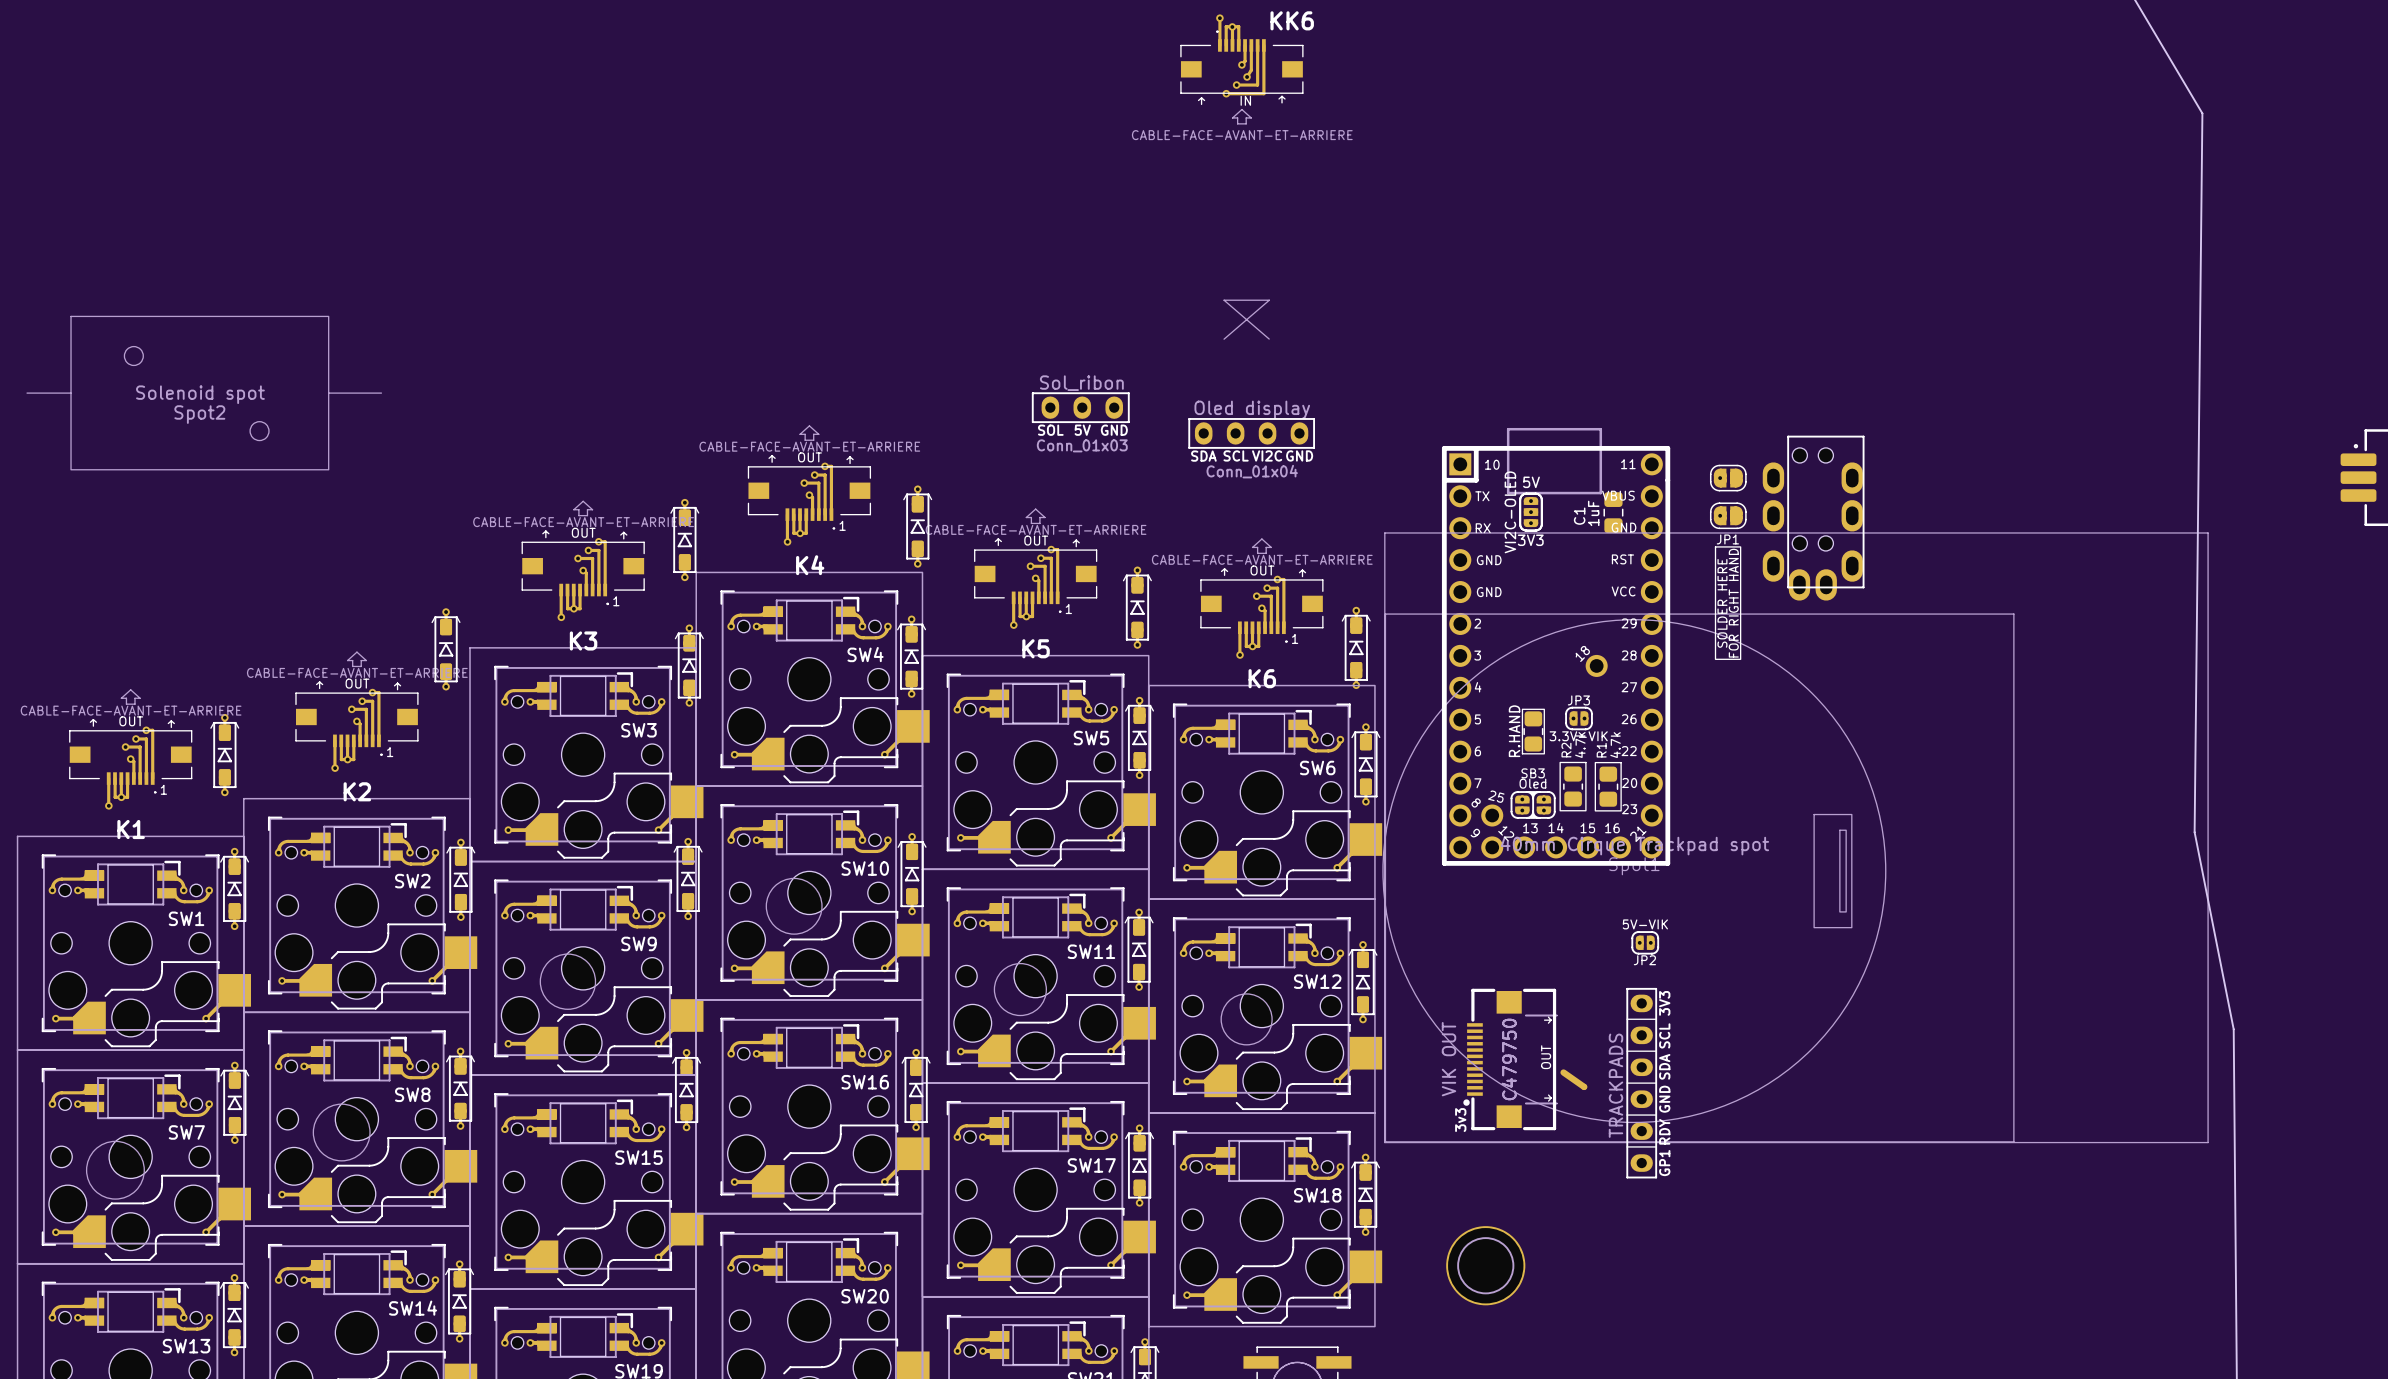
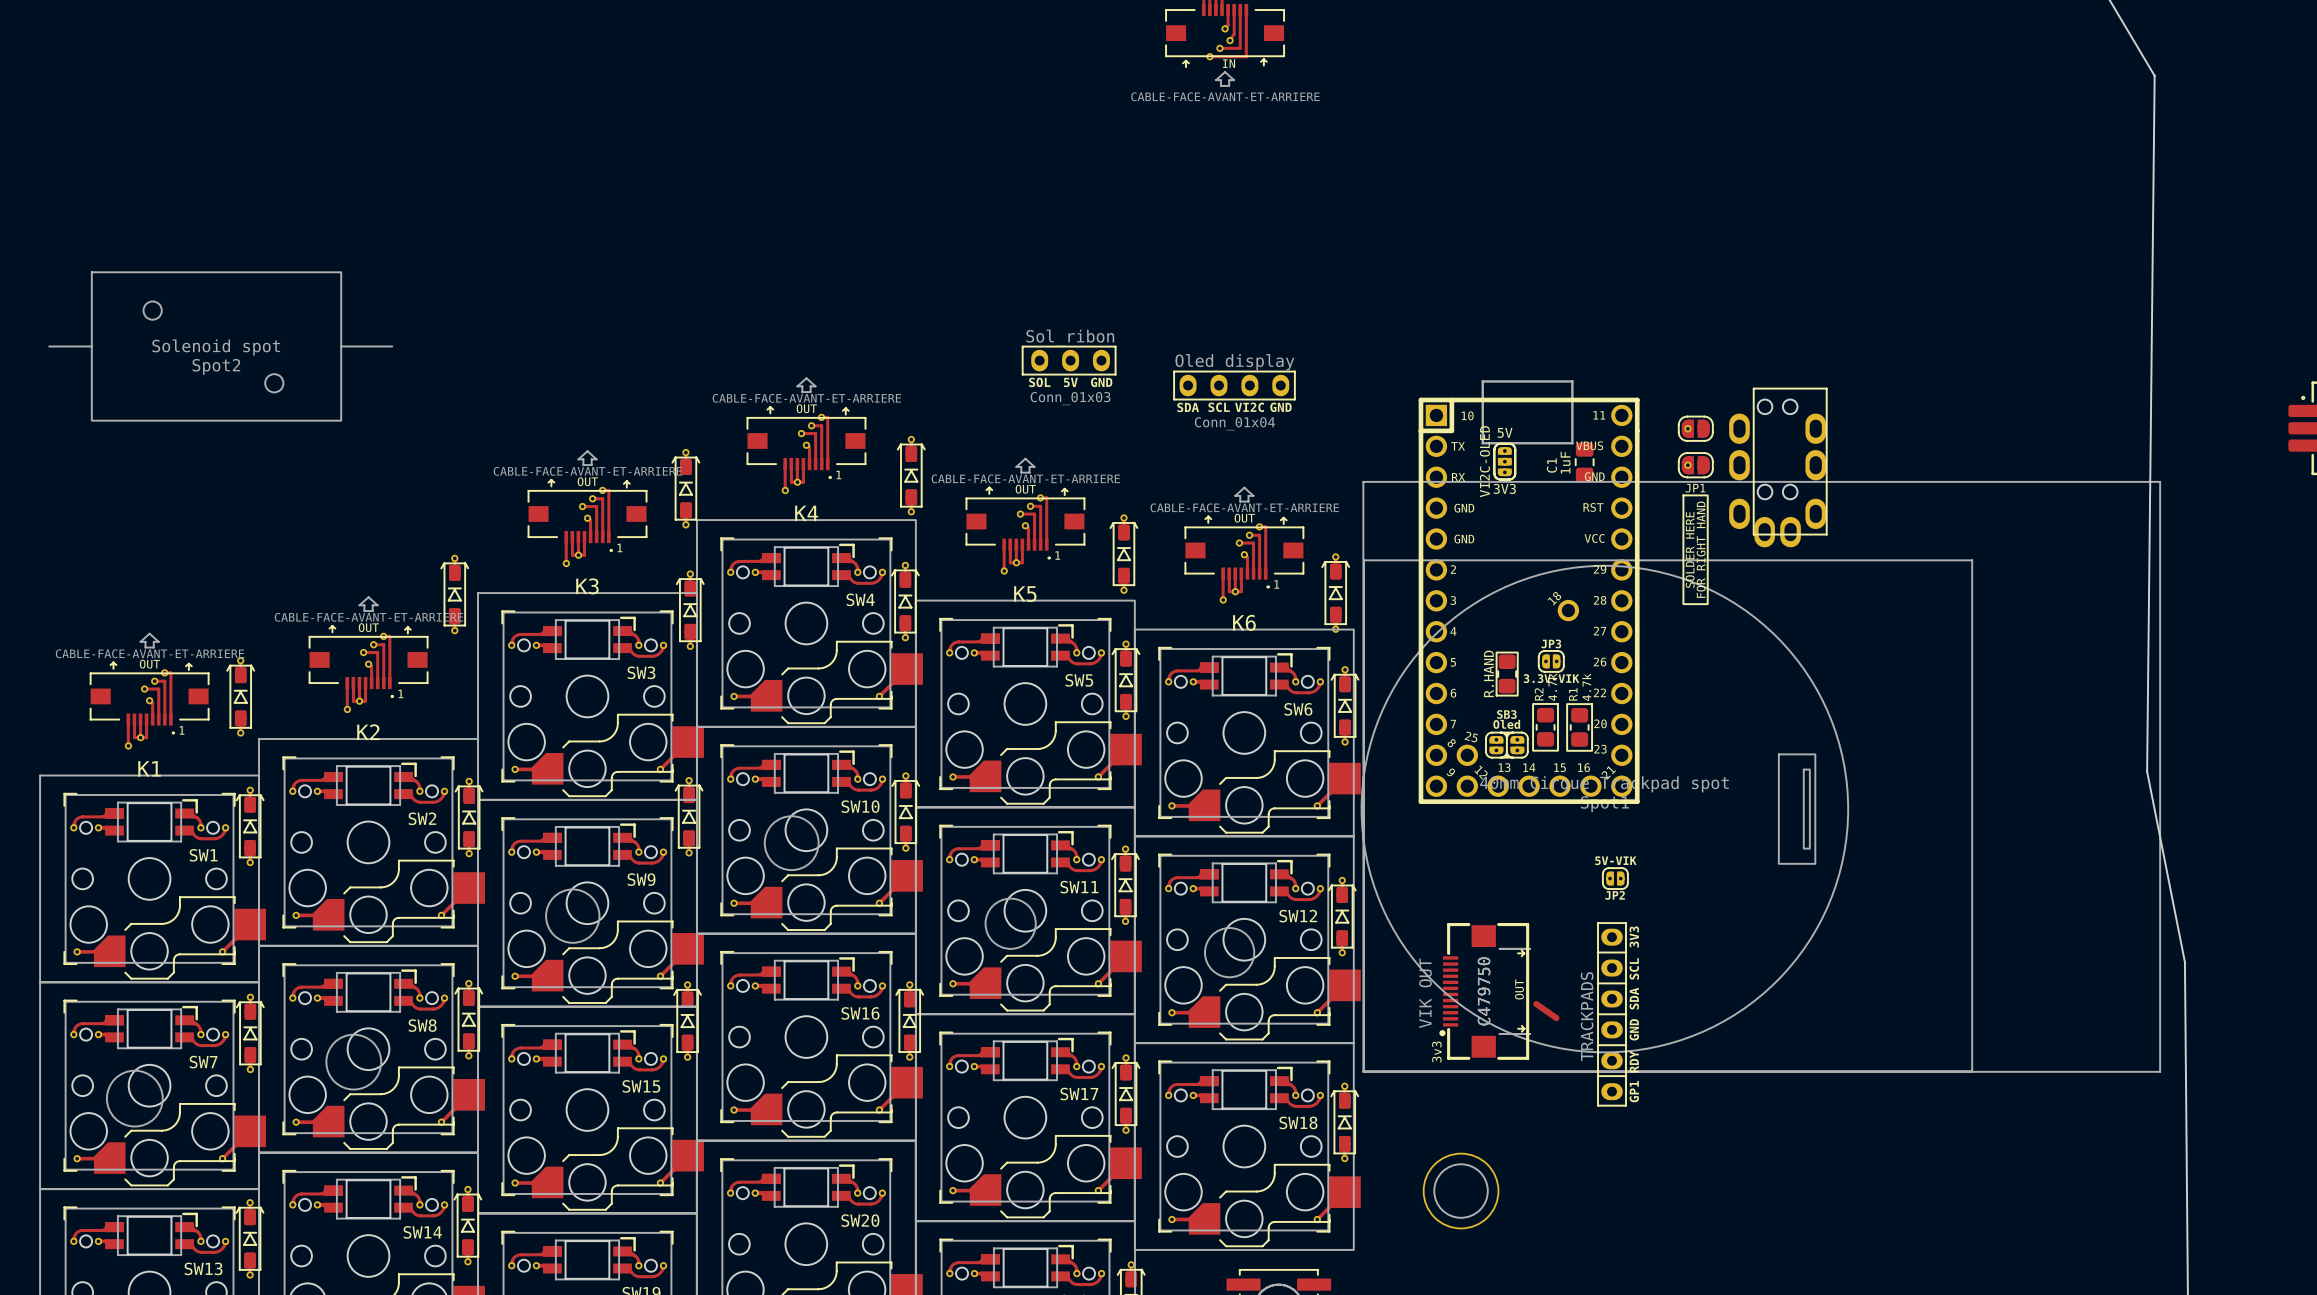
line: (1269, 339) (1224, 300) (1269, 300) (1224, 339) -> none

